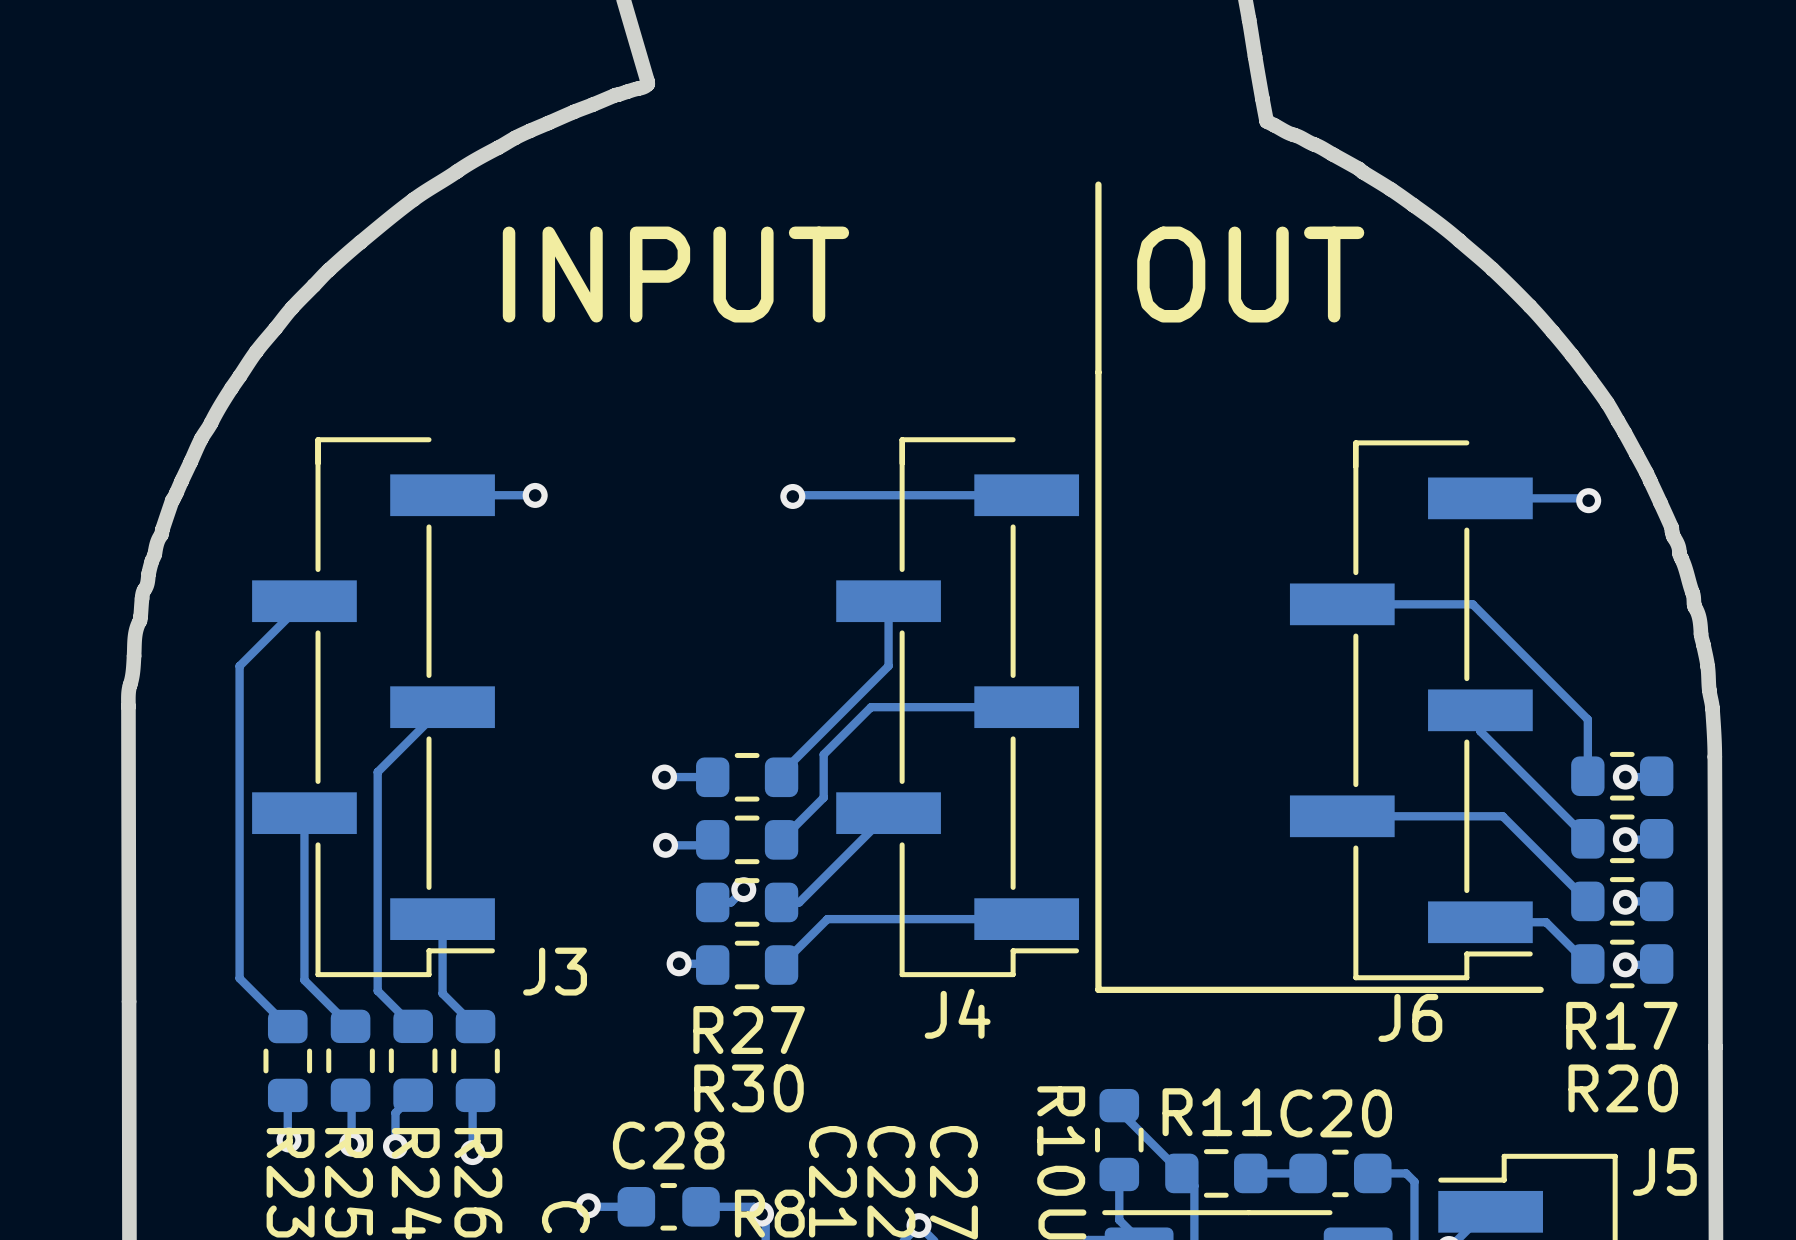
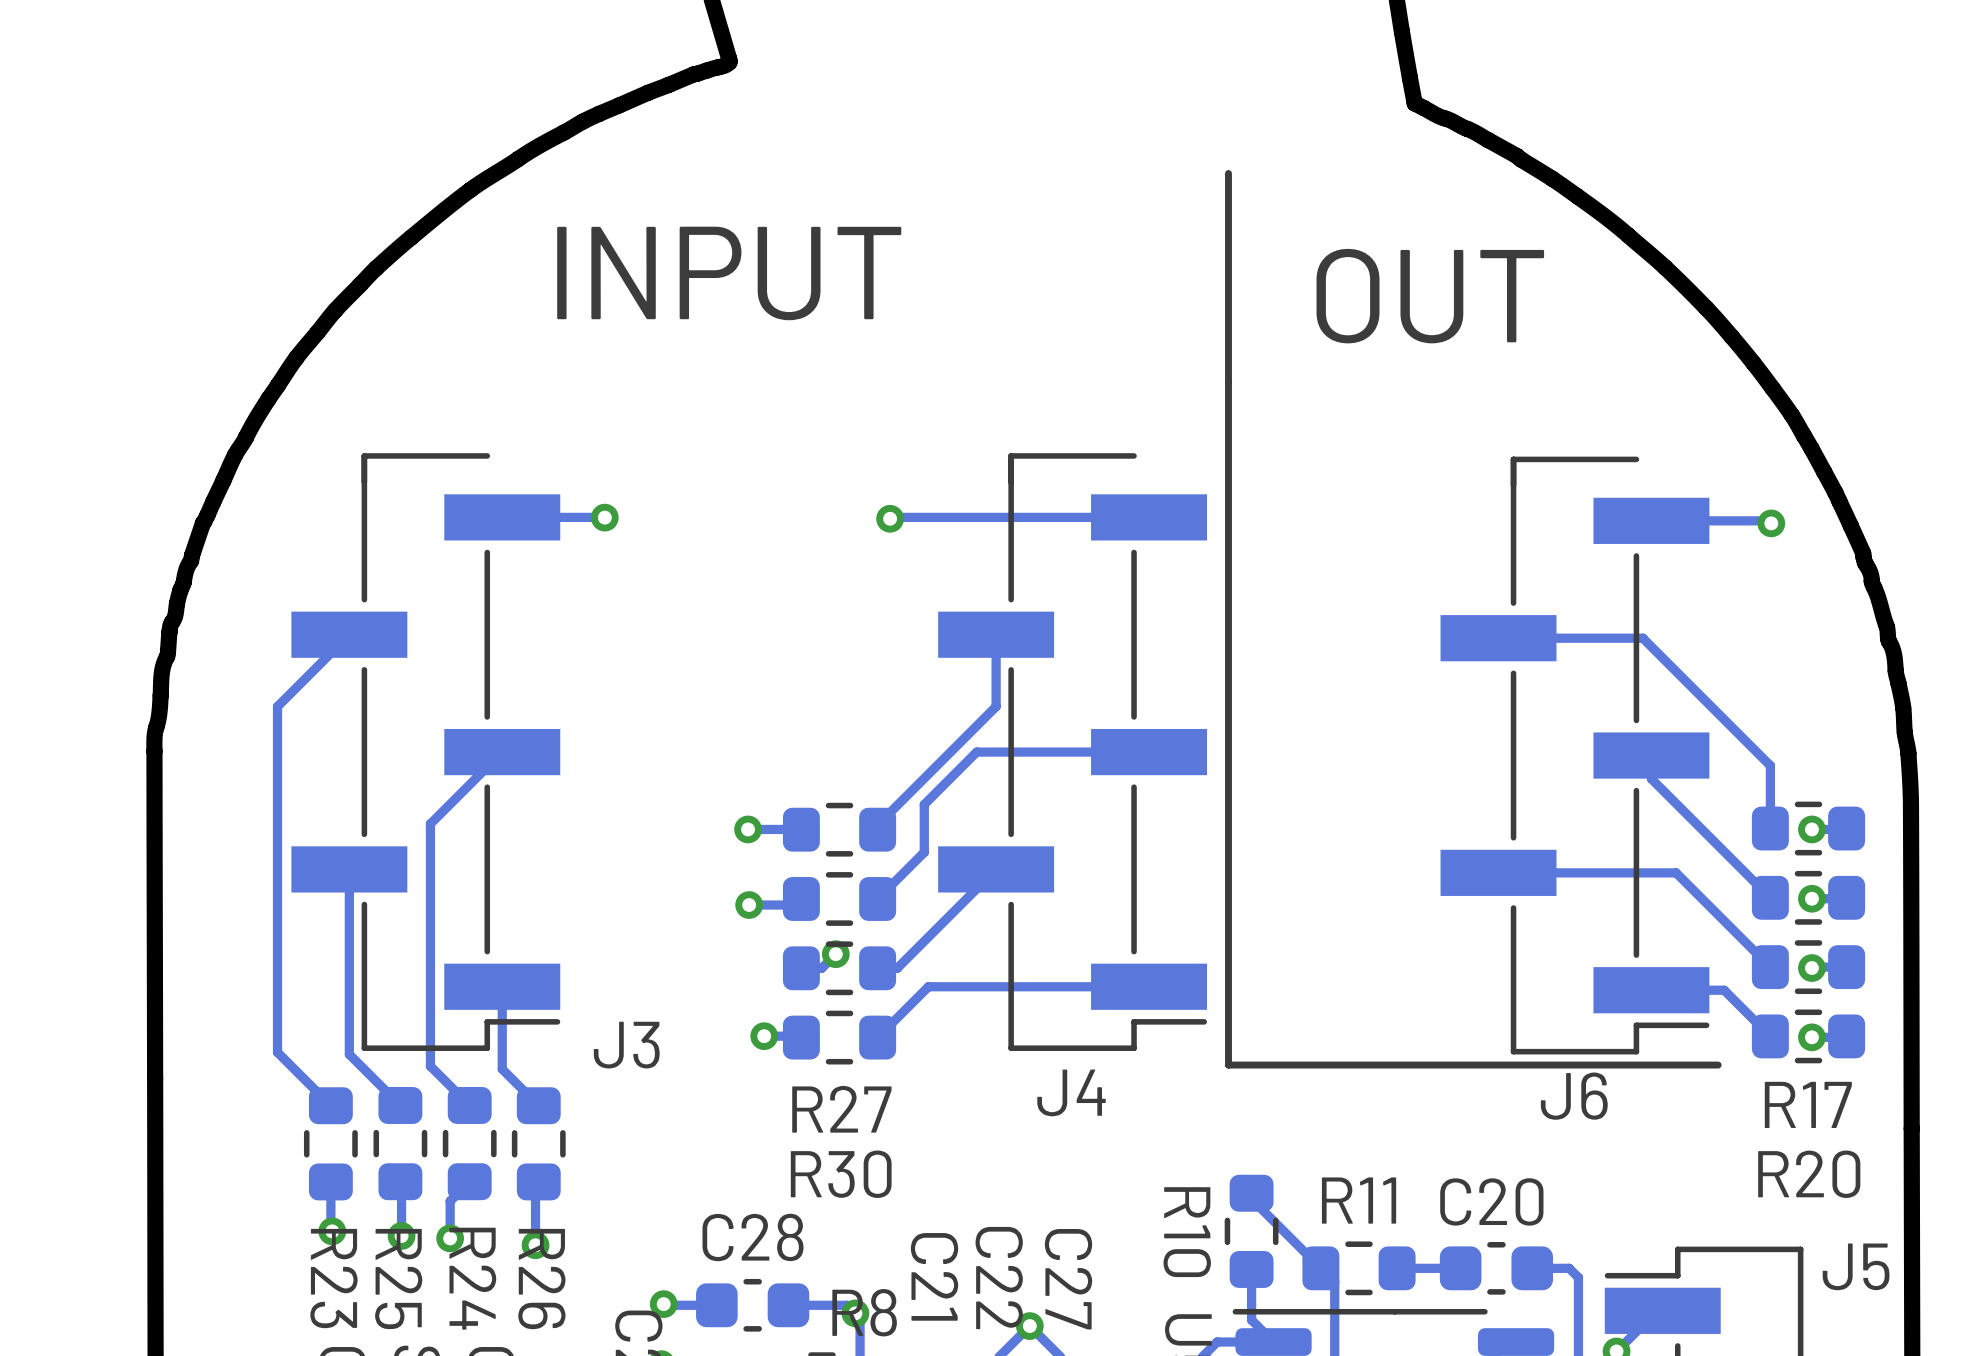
text position: OUT (1250, 274) -> OUT (1430, 296)

